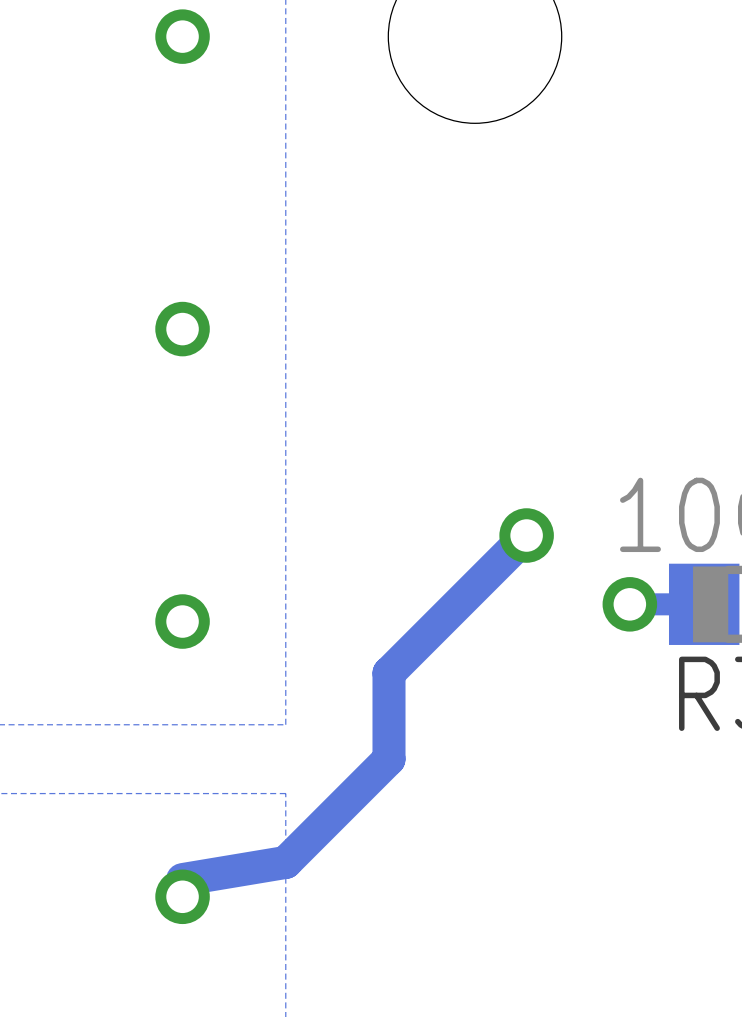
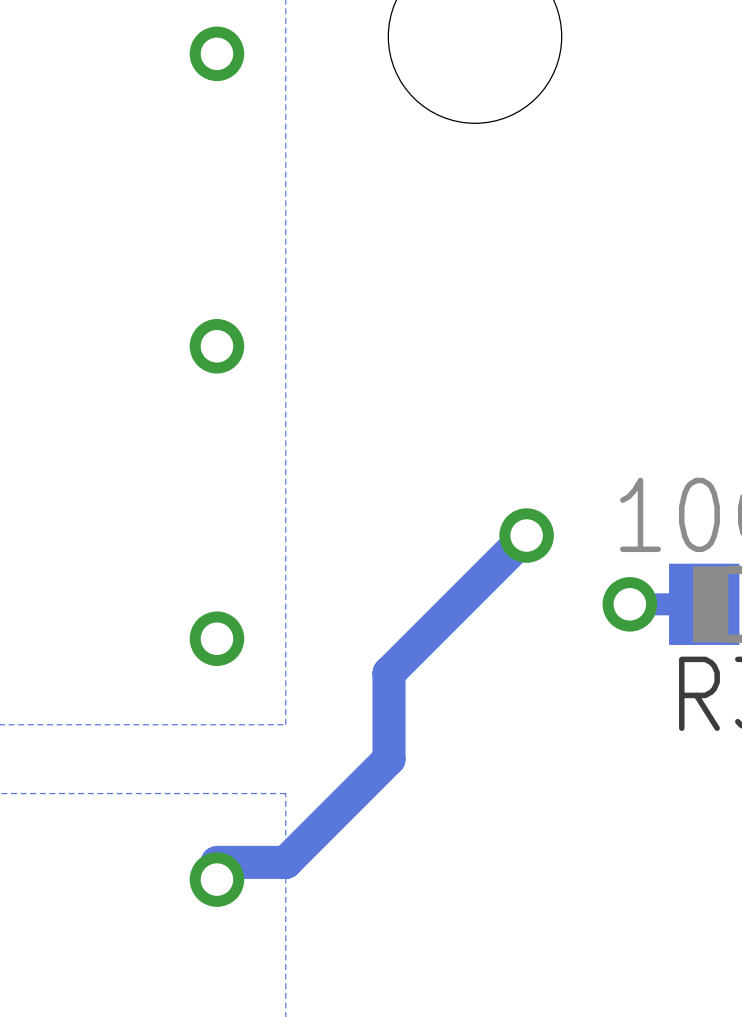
via position: (182, 36) -> (216, 53)
via position: (182, 329) -> (216, 346)
via position: (182, 621) -> (216, 638)
track: (285, 862) (182, 879) -> (285, 862) (216, 862)
via position: (182, 896) -> (216, 879)

